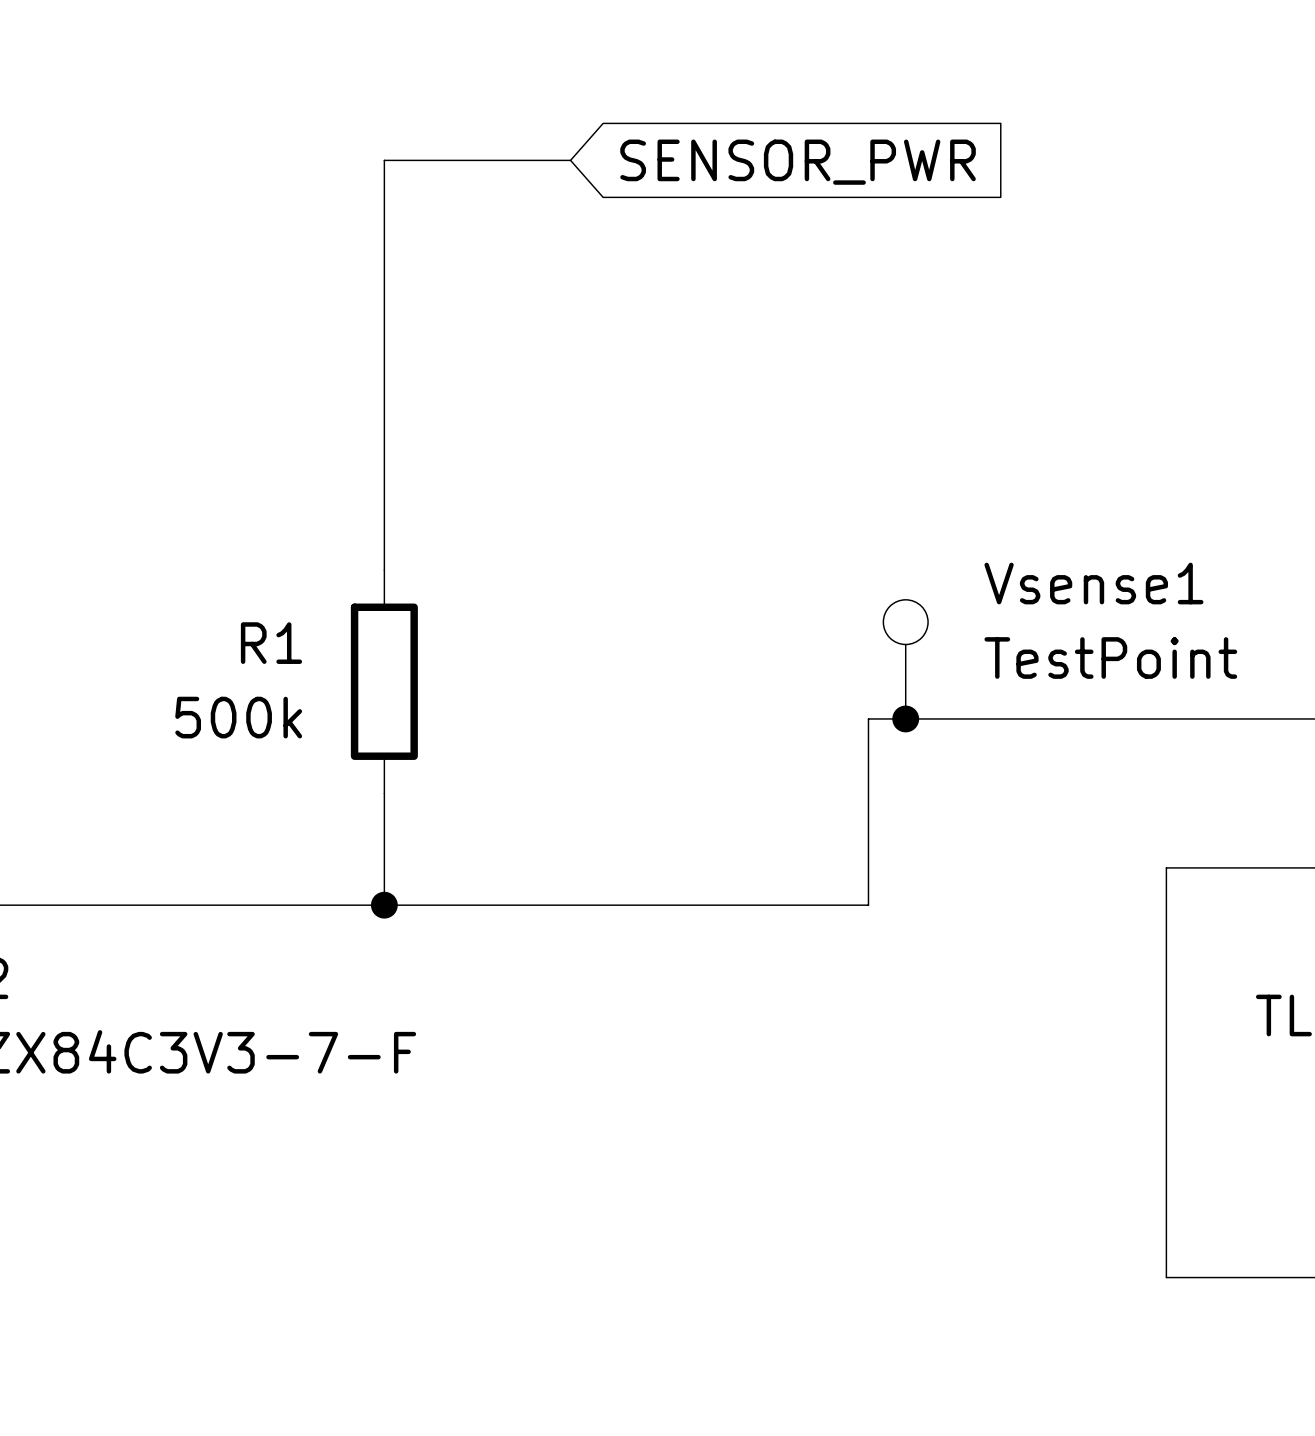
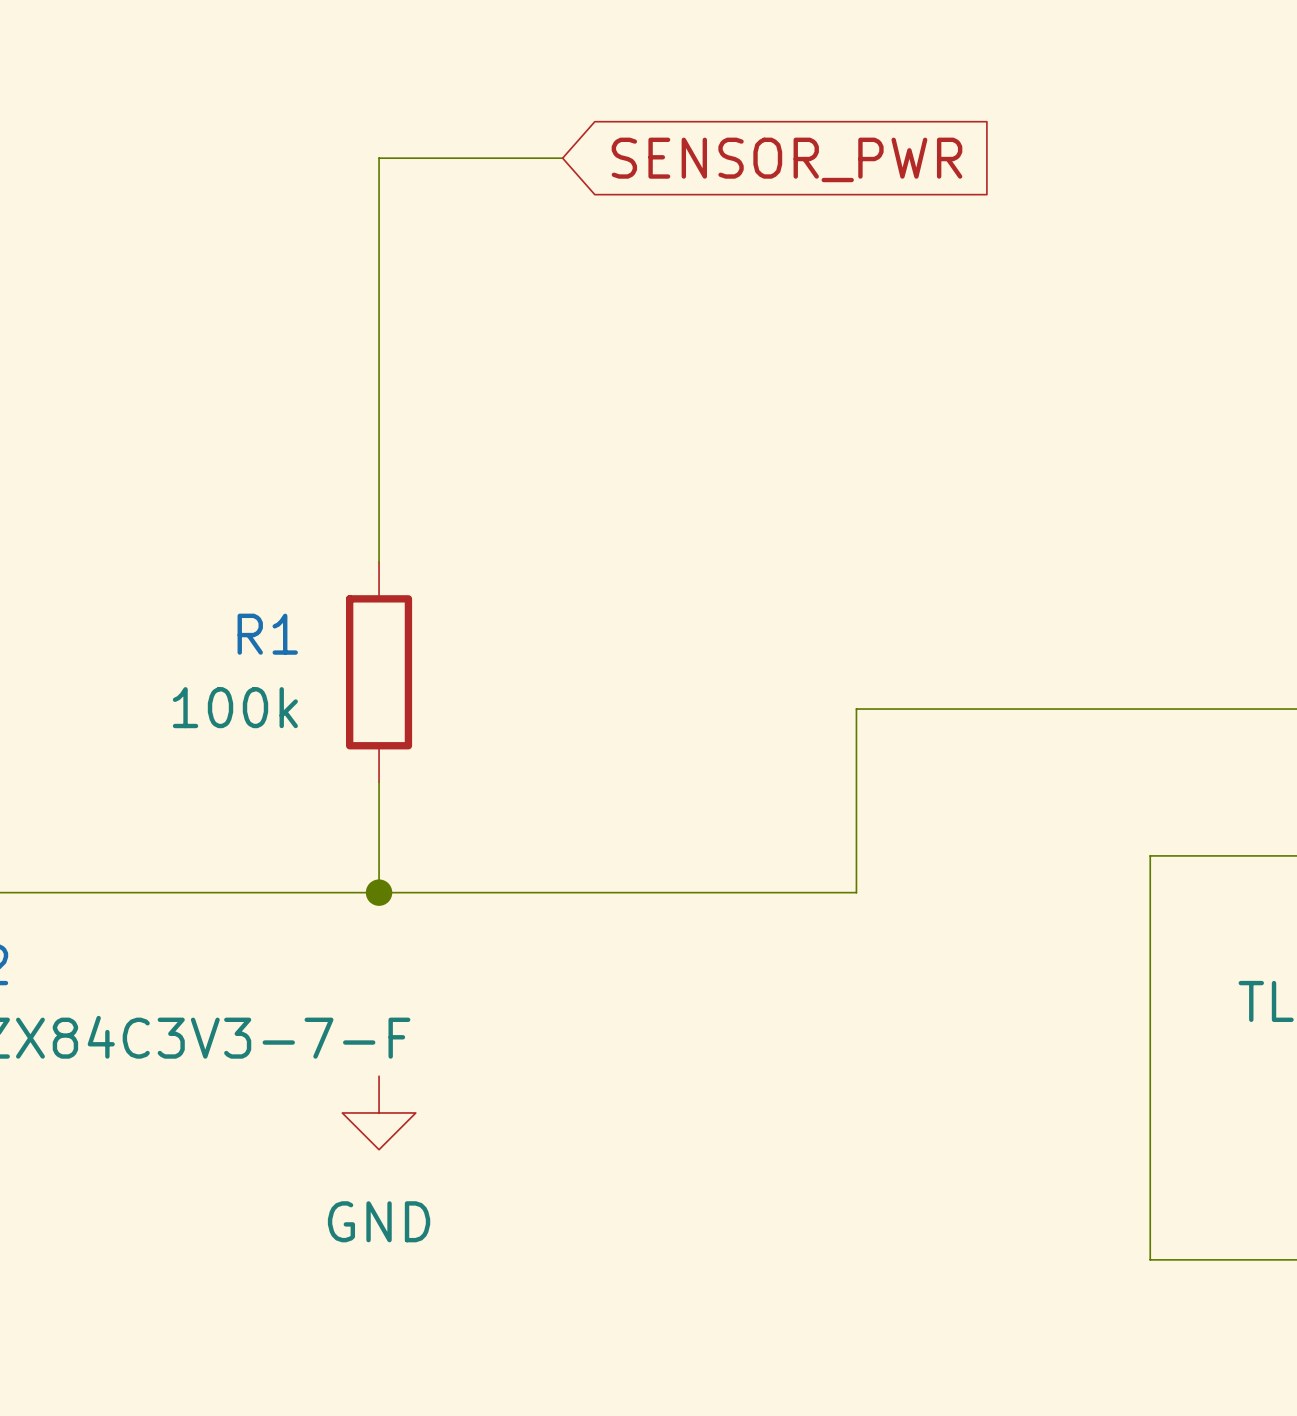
Vsense1: TestPoint (905, 659) -> none
R1 value: 500k (238, 717) -> 100k (235, 707)
junction: (905, 718) -> none
power symbol: none -> GND (379, 1112)

